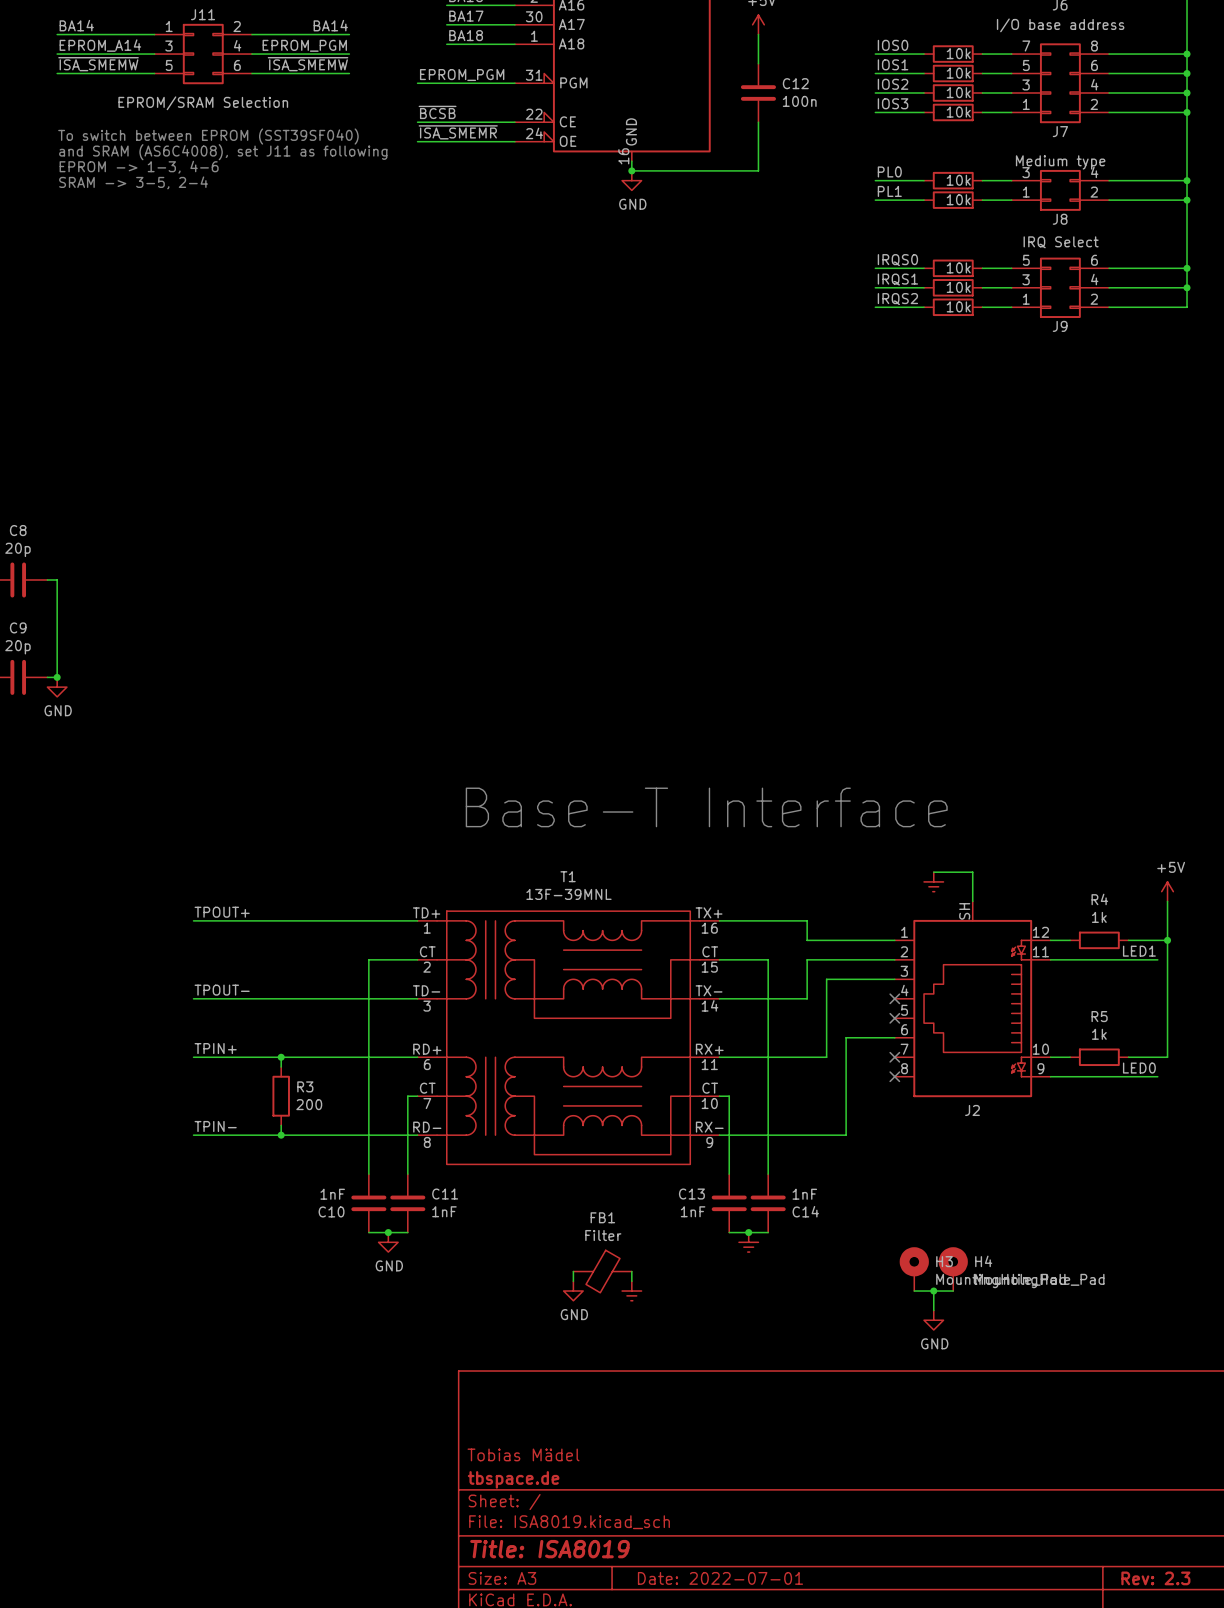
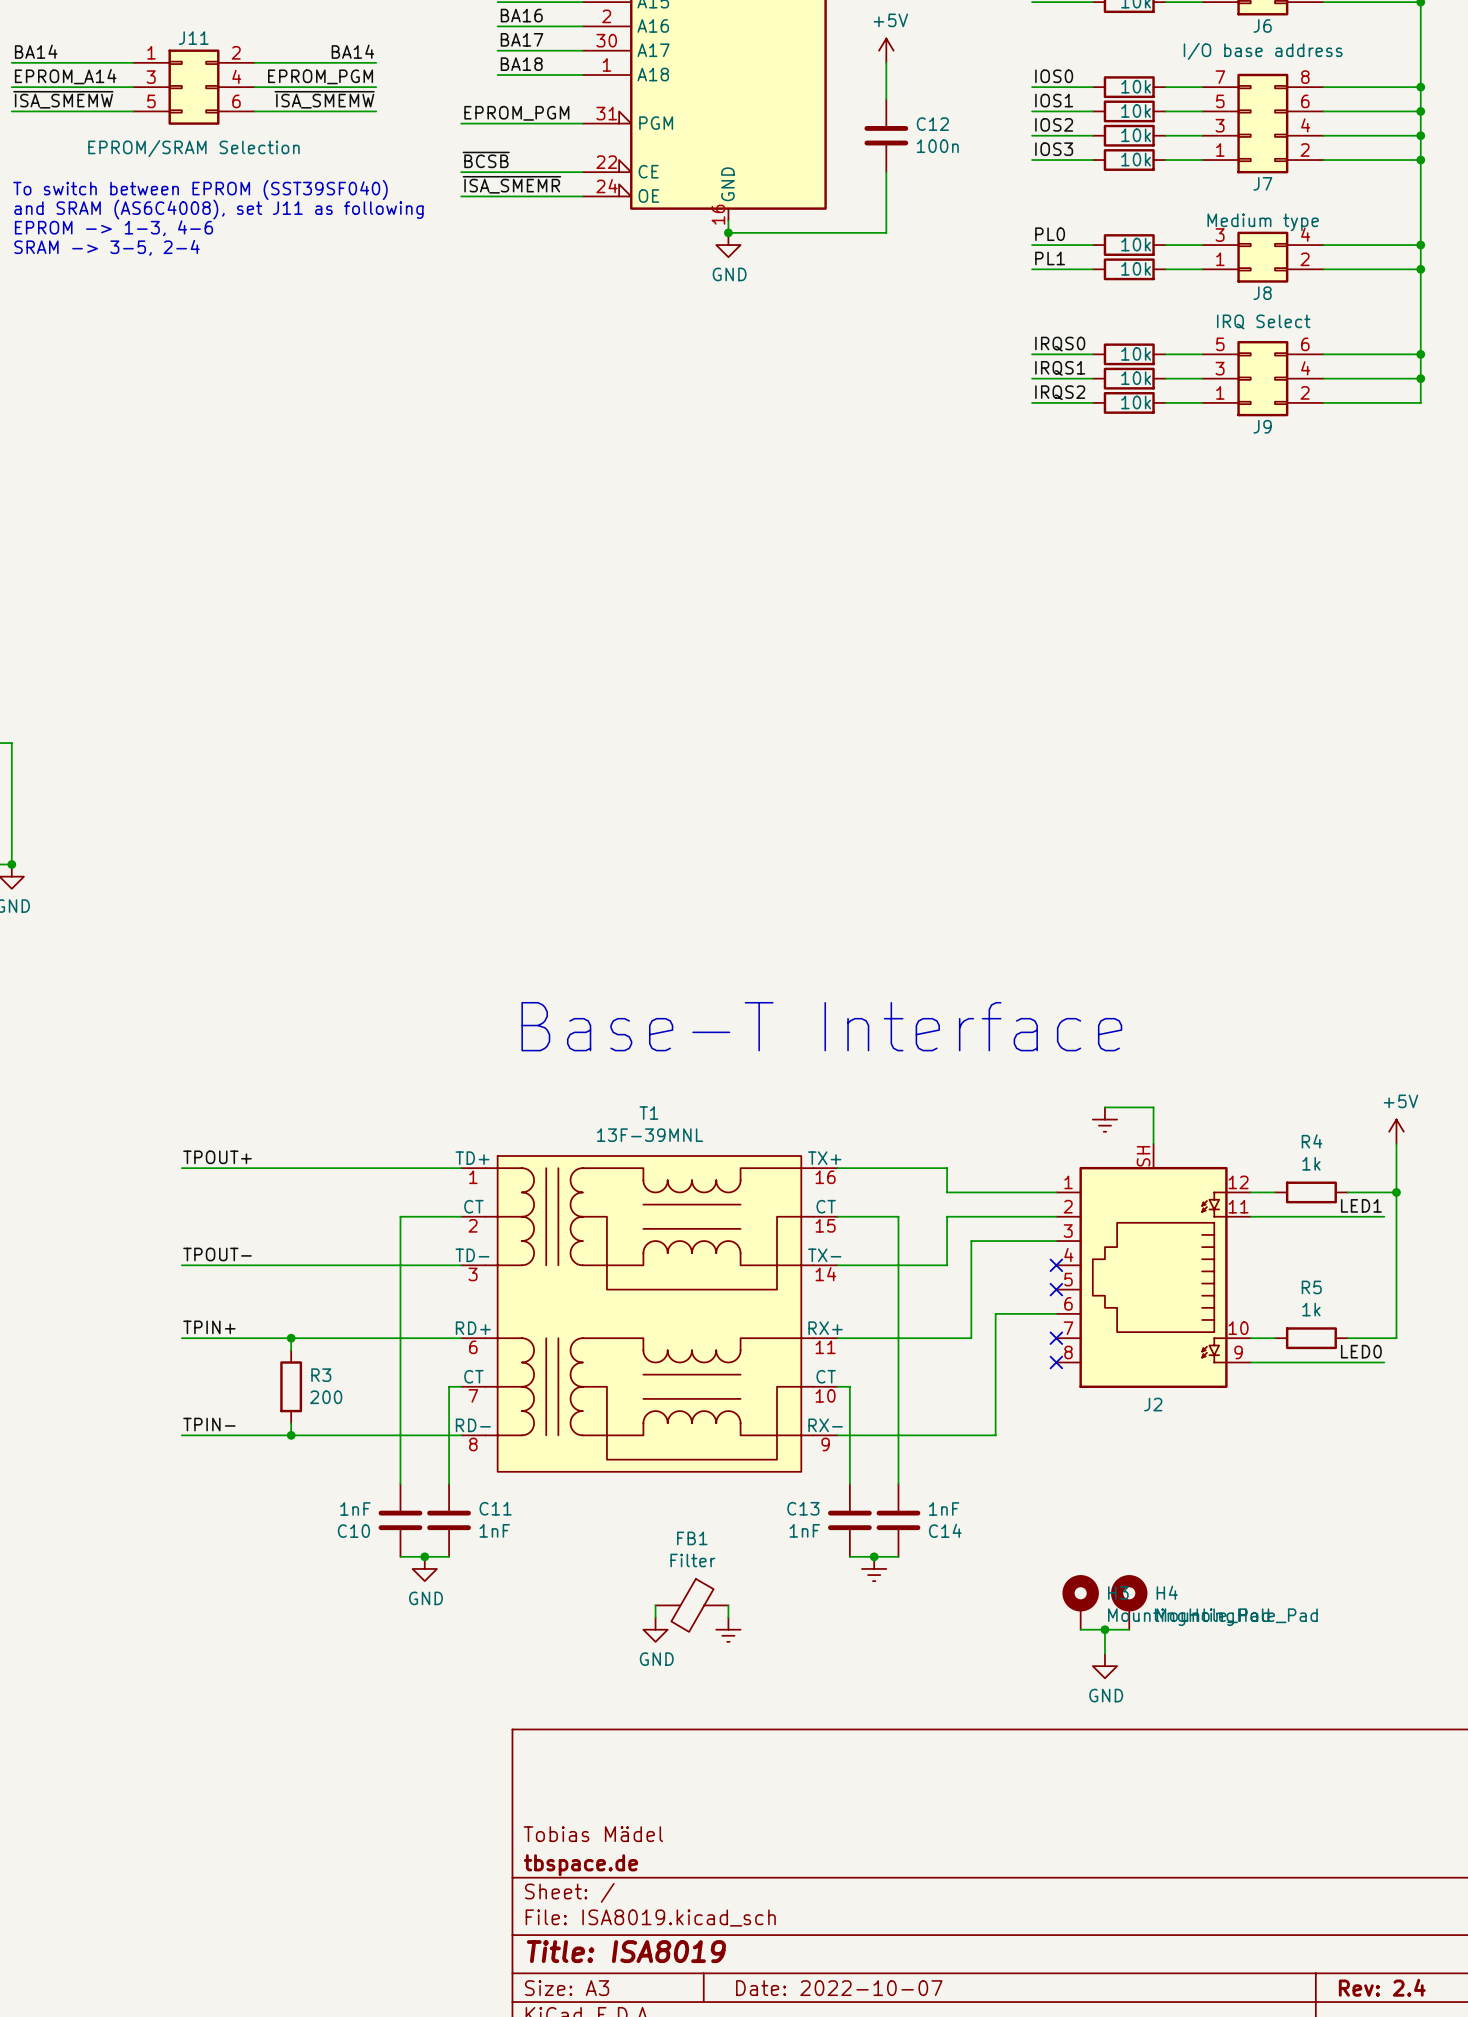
title block: Date: 2022-07-01 (720, 1578) -> Date: 2022-10-07 (839, 1988)
title block: Rev: 2.3 (1155, 1578) -> Rev: 2.4 (1382, 1987)

